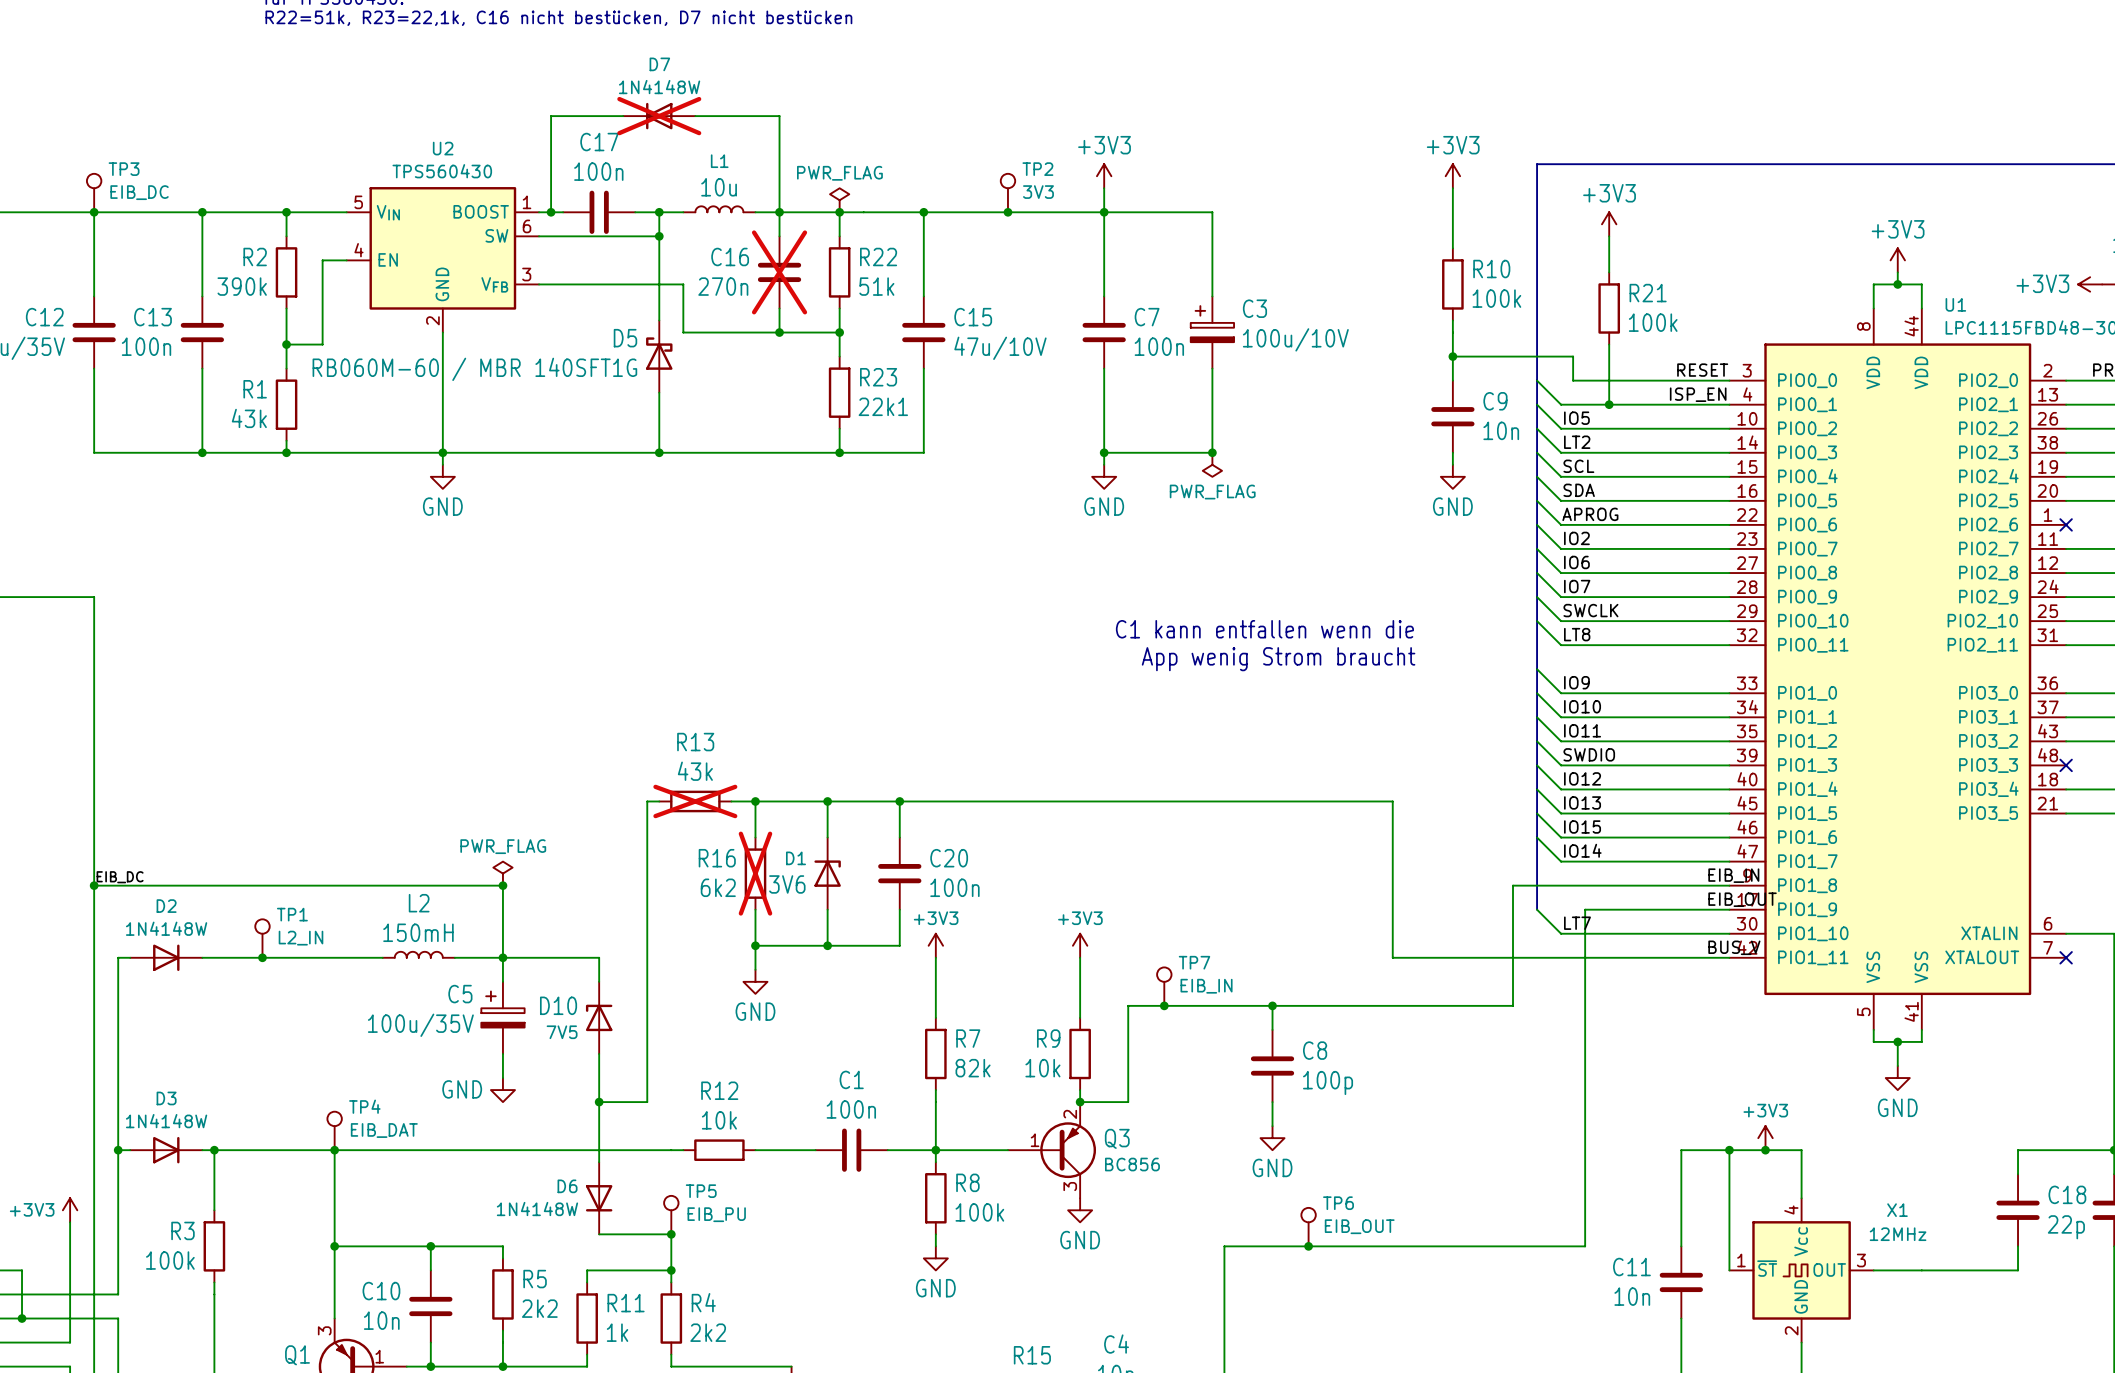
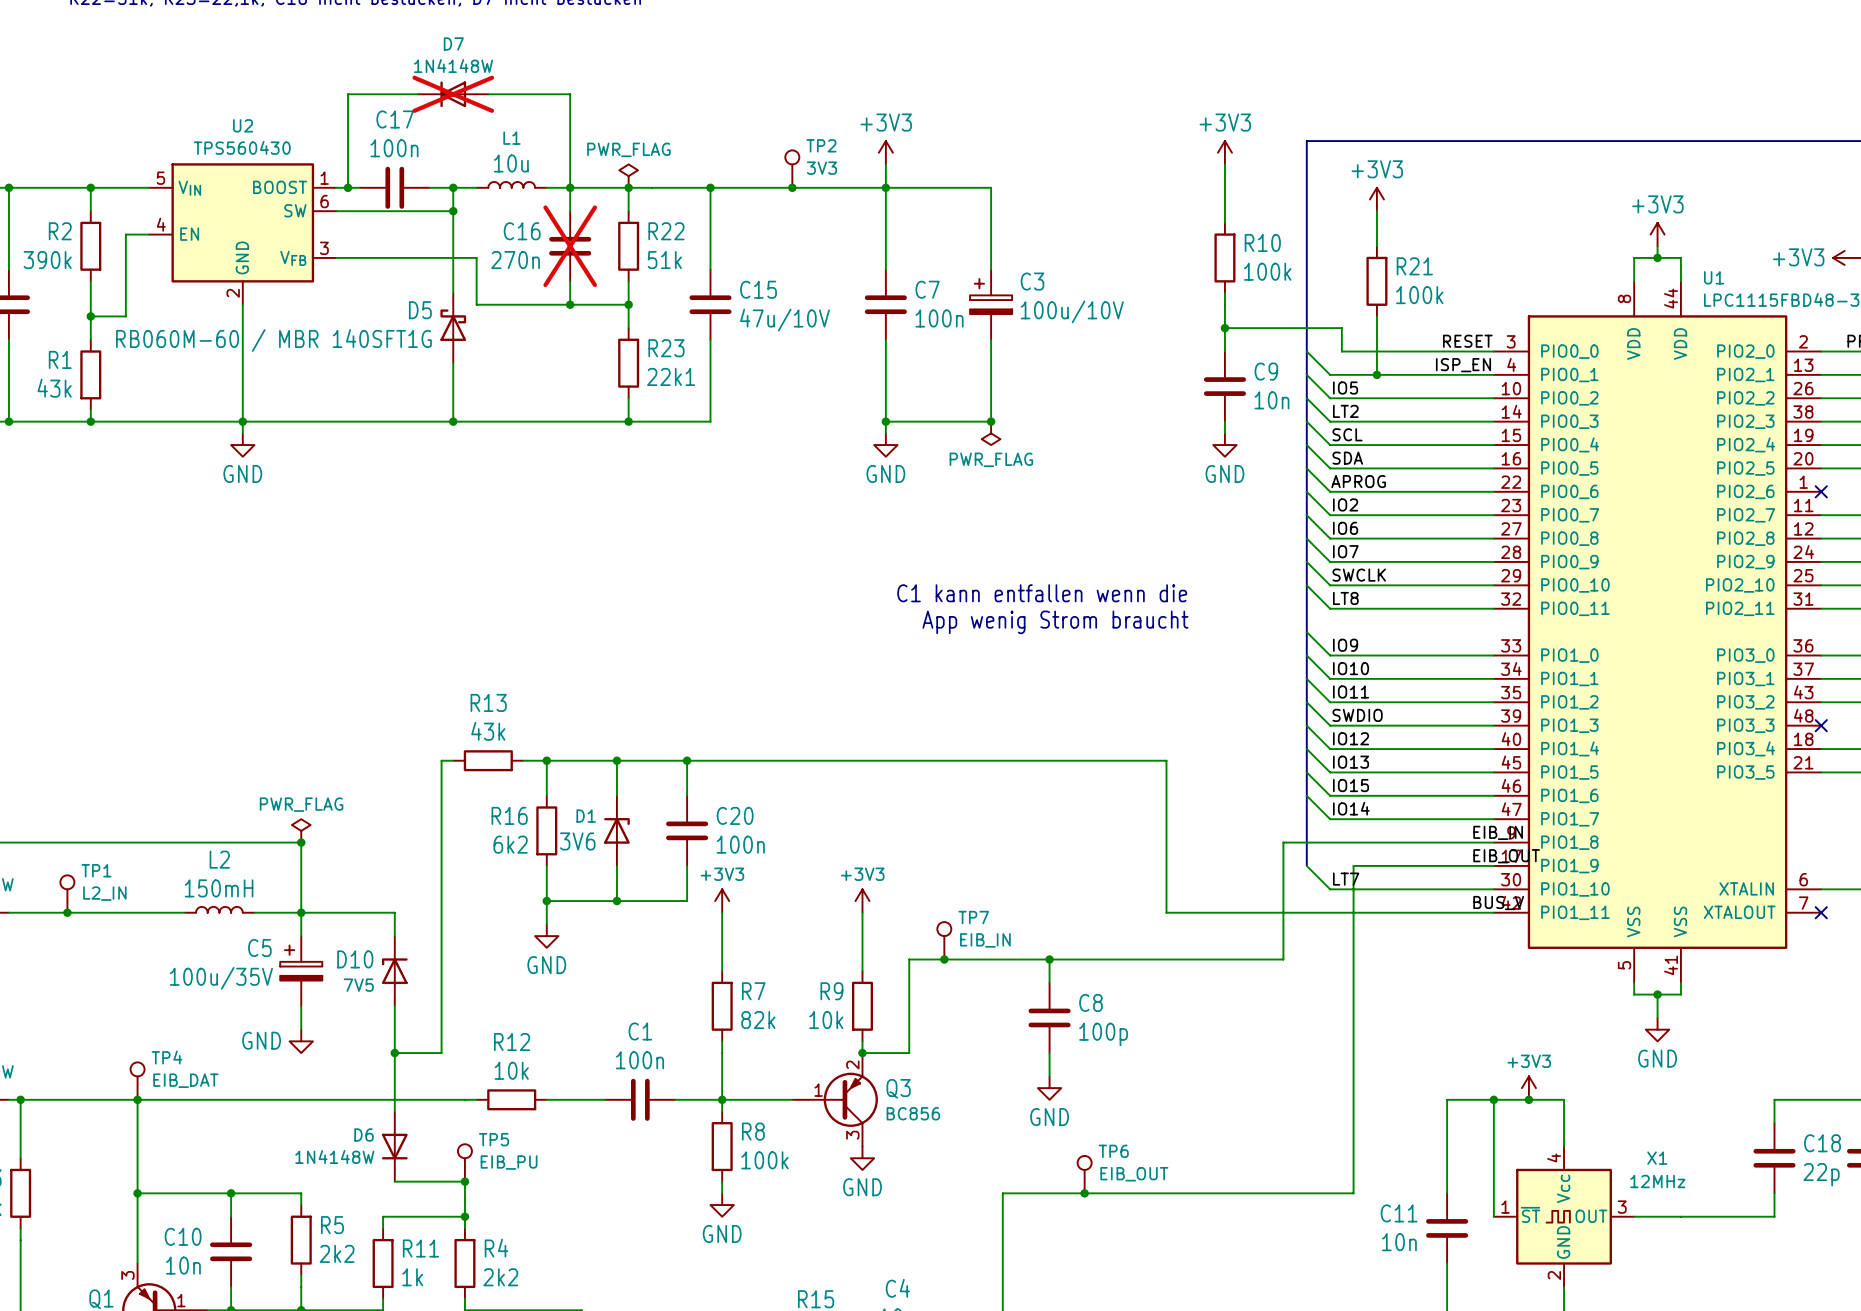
R13 do-not-place cross: (695, 801) -> none
R16 do-not-place cross: (755, 873) -> none

